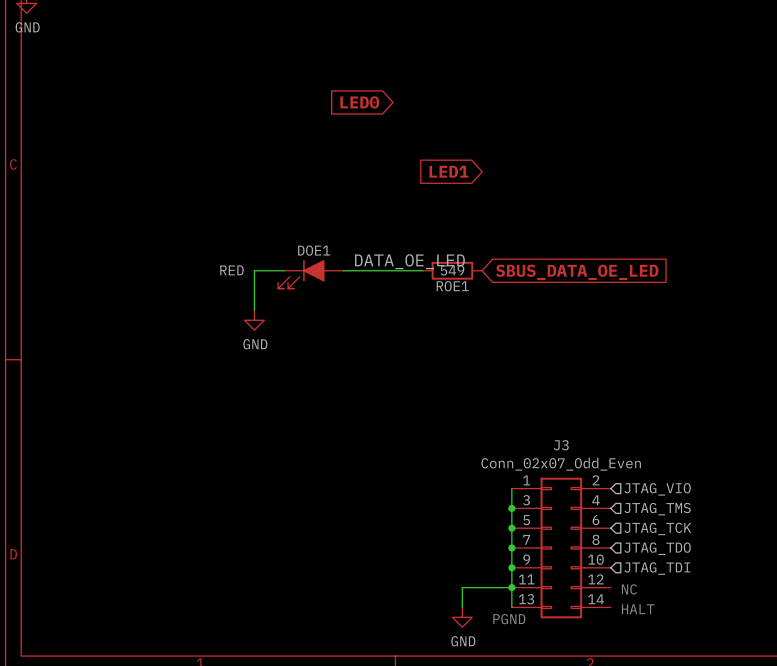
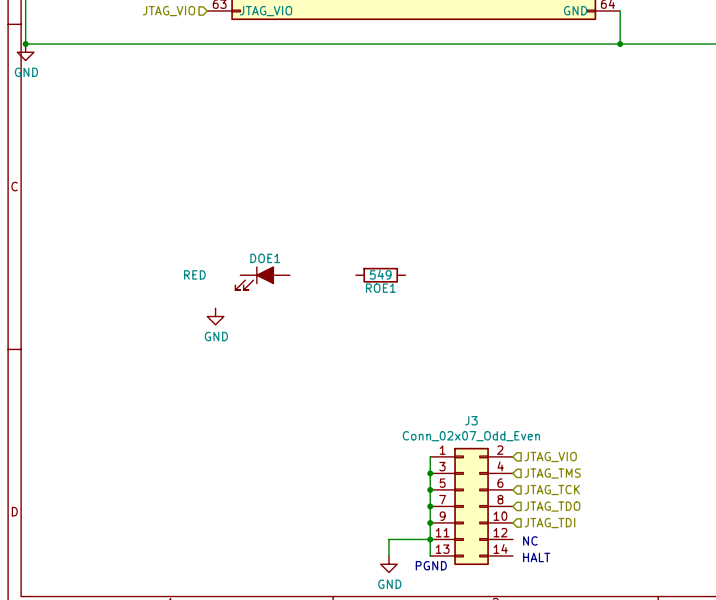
global label: LED0 (359, 102) -> none
global label: LED1 (448, 171) -> none
label: DATA_OE_LED (409, 261) -> none
wire: (284, 270) (254, 270) (254, 310) -> none
wire: (343, 270) (422, 270) -> none
global label: SBUS_DATA_OE_LED (577, 272) -> none

